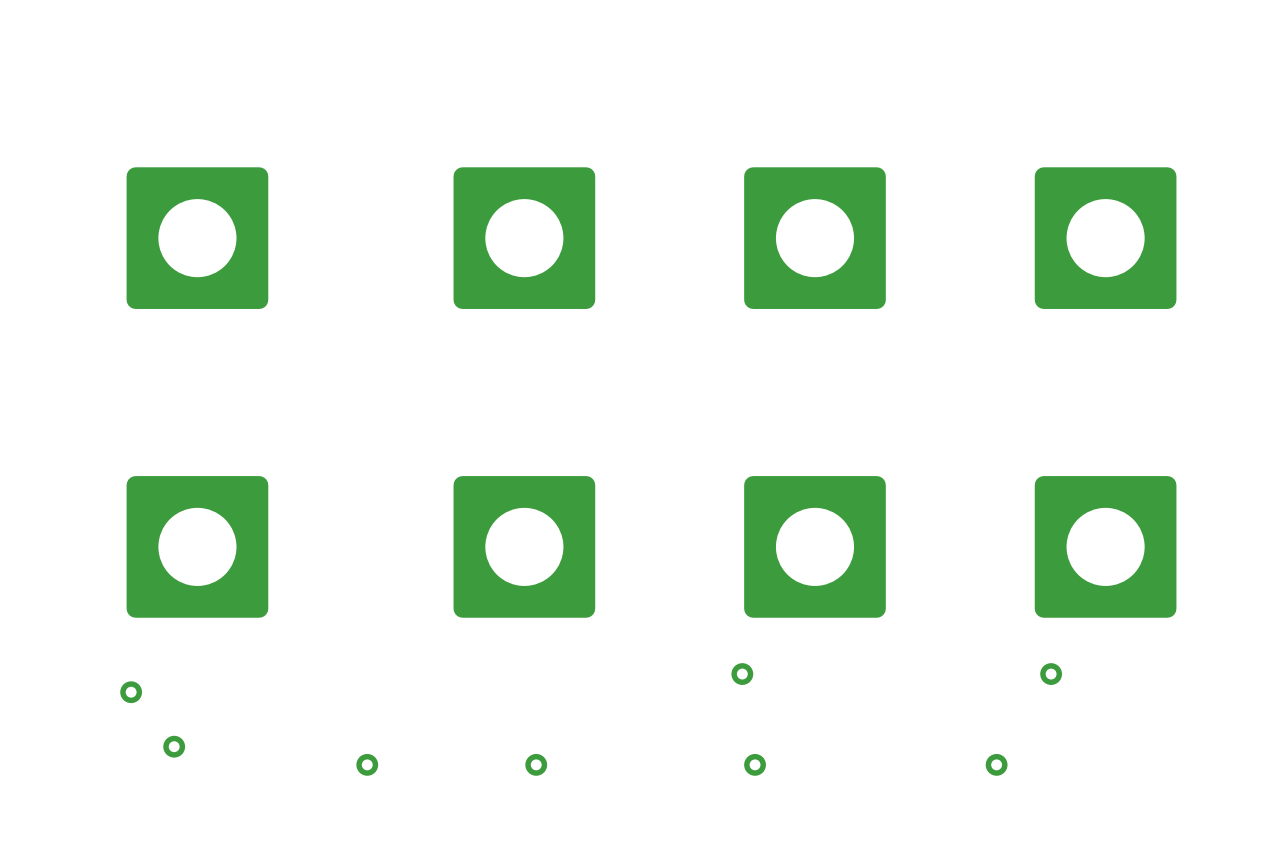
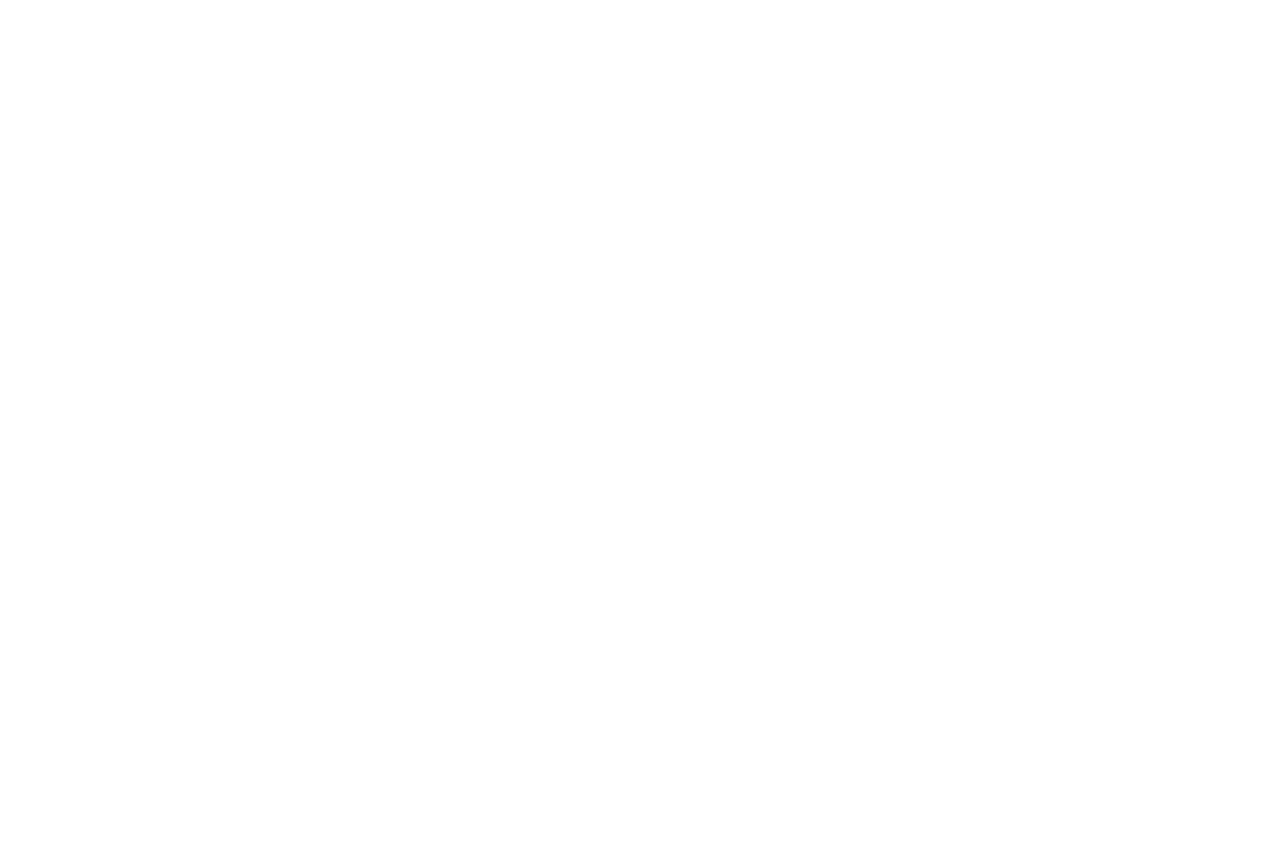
part: (197, 238) -> none
part: (524, 238) -> none
part: (814, 238) -> none
part: (1105, 238) -> none
part: (197, 546) -> none
part: (524, 546) -> none
part: (814, 546) -> none
part: (1105, 546) -> none
via: (742, 674) -> none
via: (1051, 674) -> none
via: (131, 692) -> none
via: (174, 746) -> none
via: (367, 764) -> none
via: (536, 764) -> none
via: (755, 764) -> none
via: (996, 764) -> none

